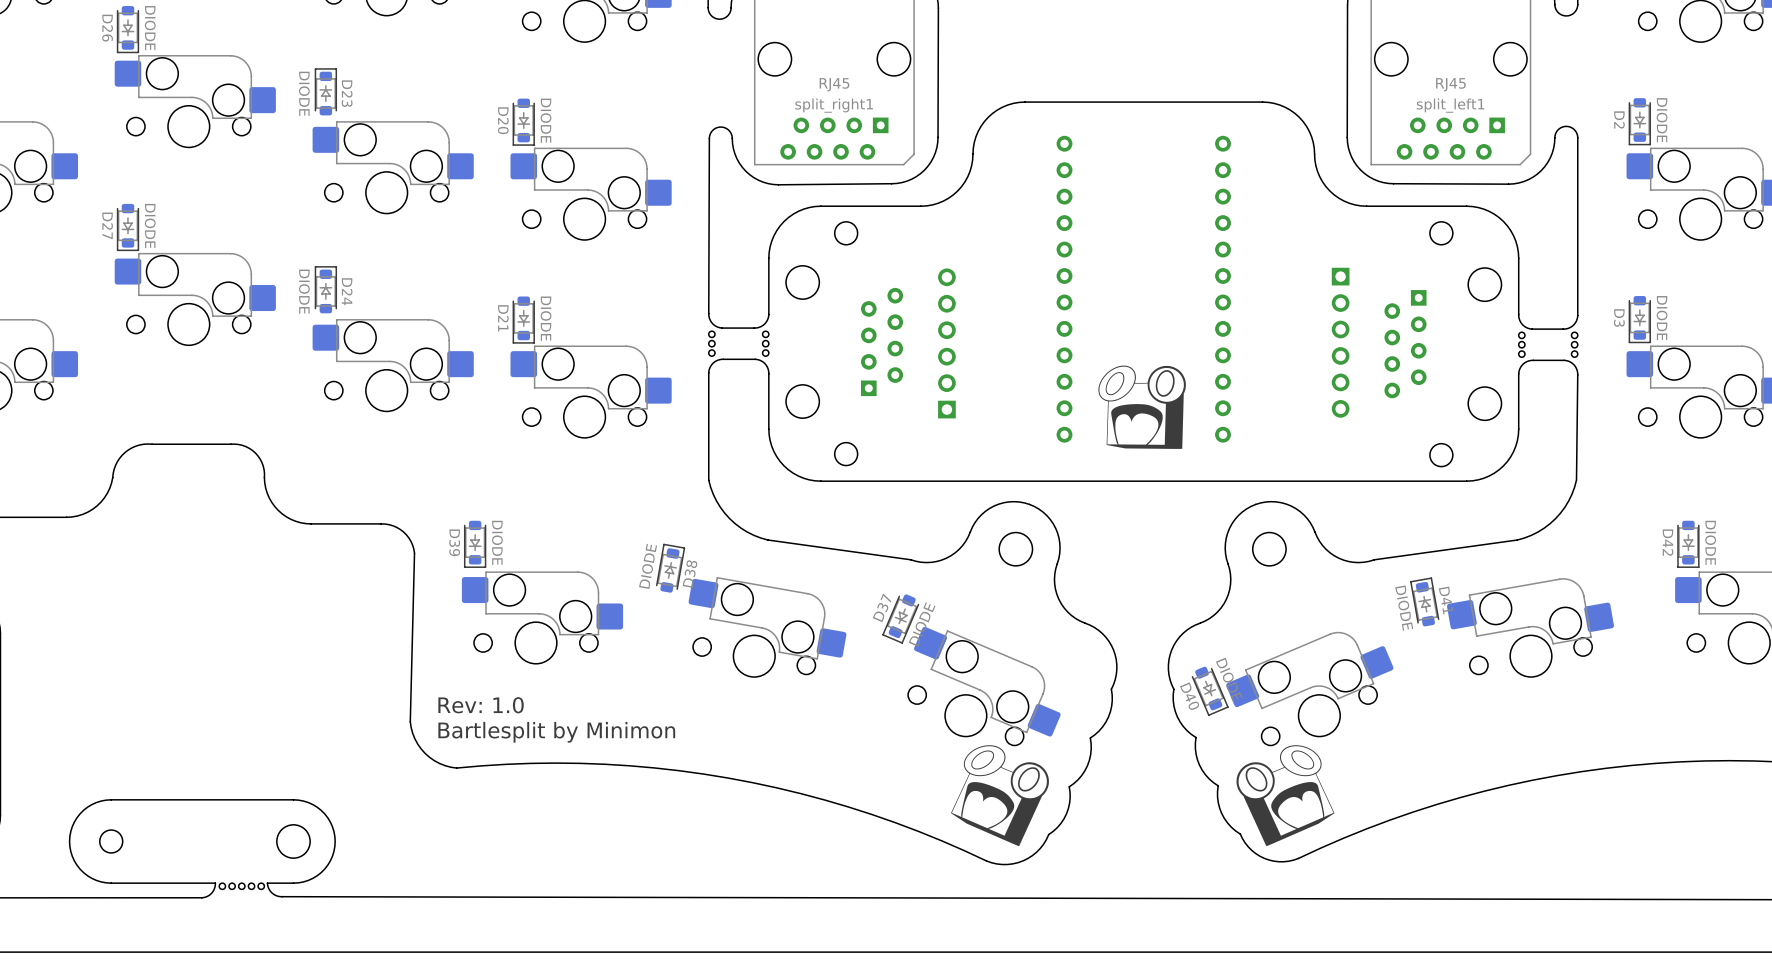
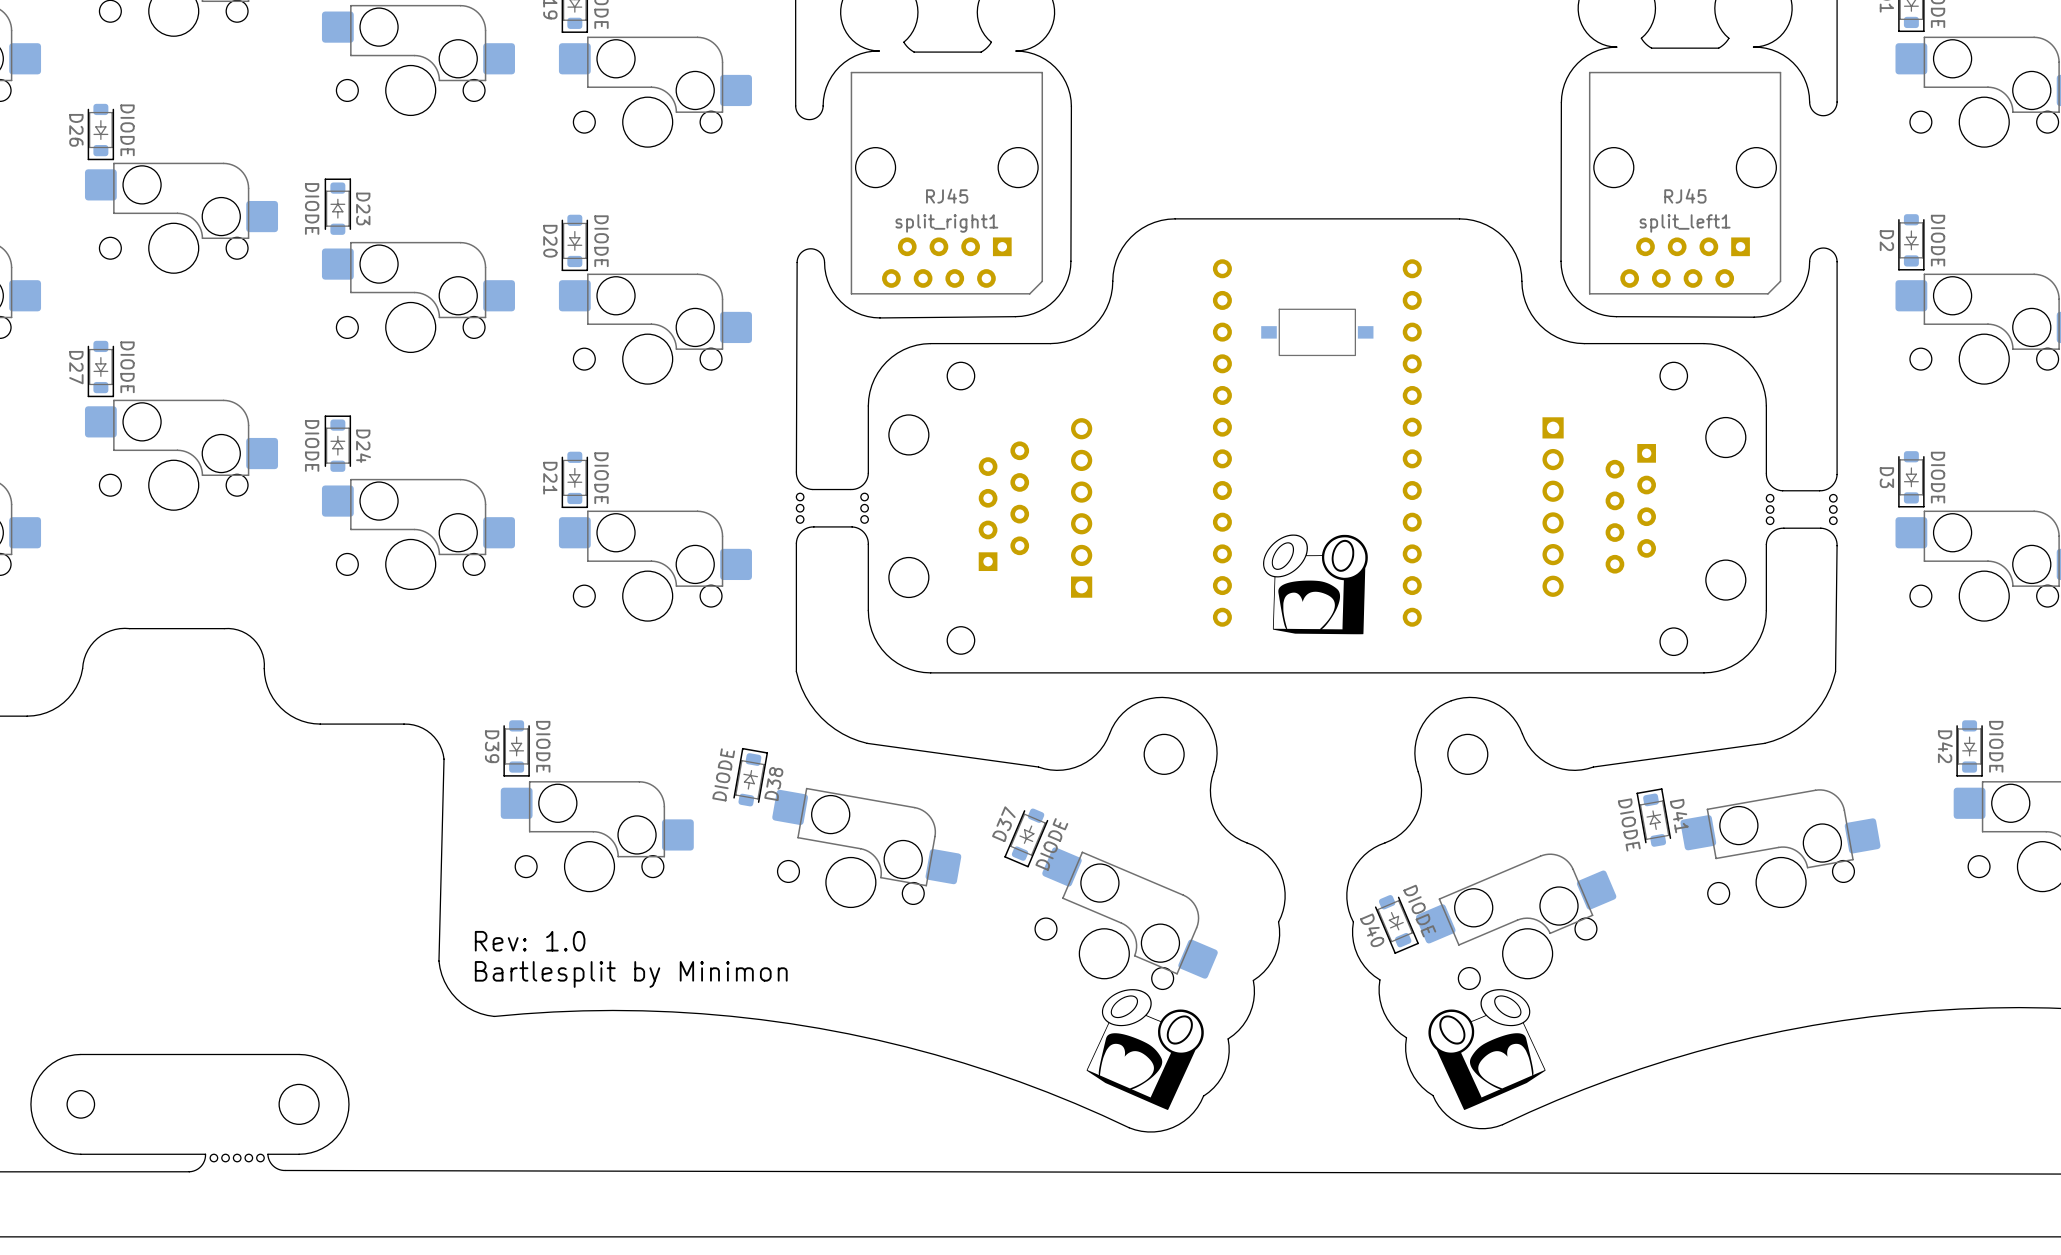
part: none -> (1317, 332)

